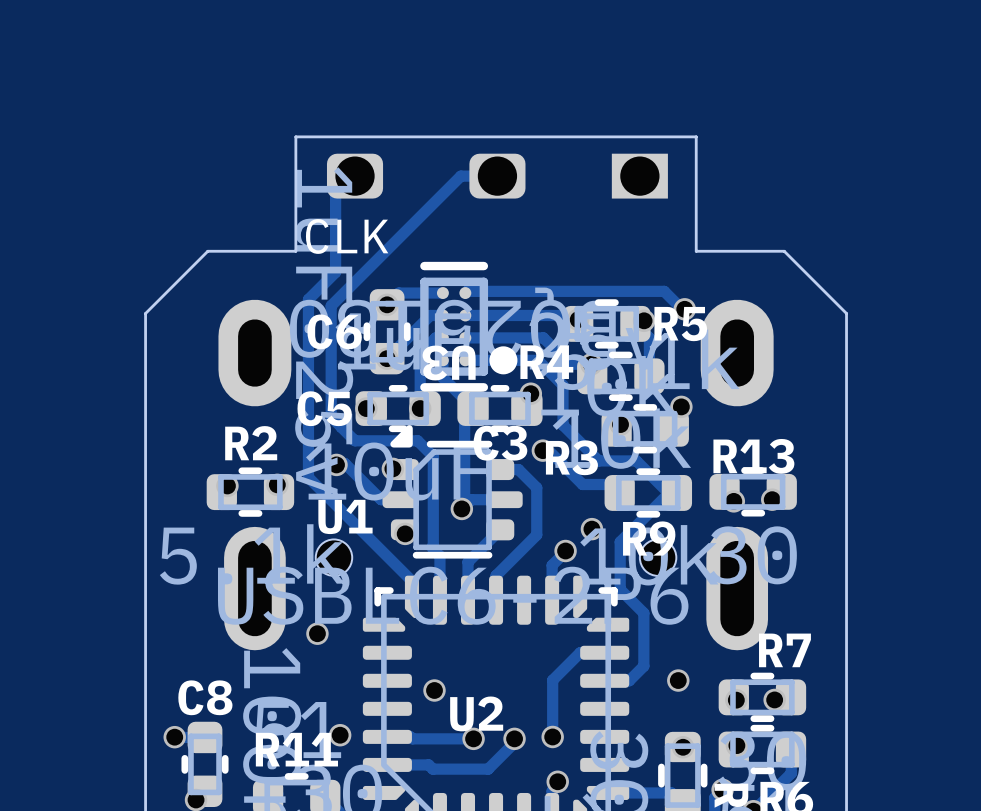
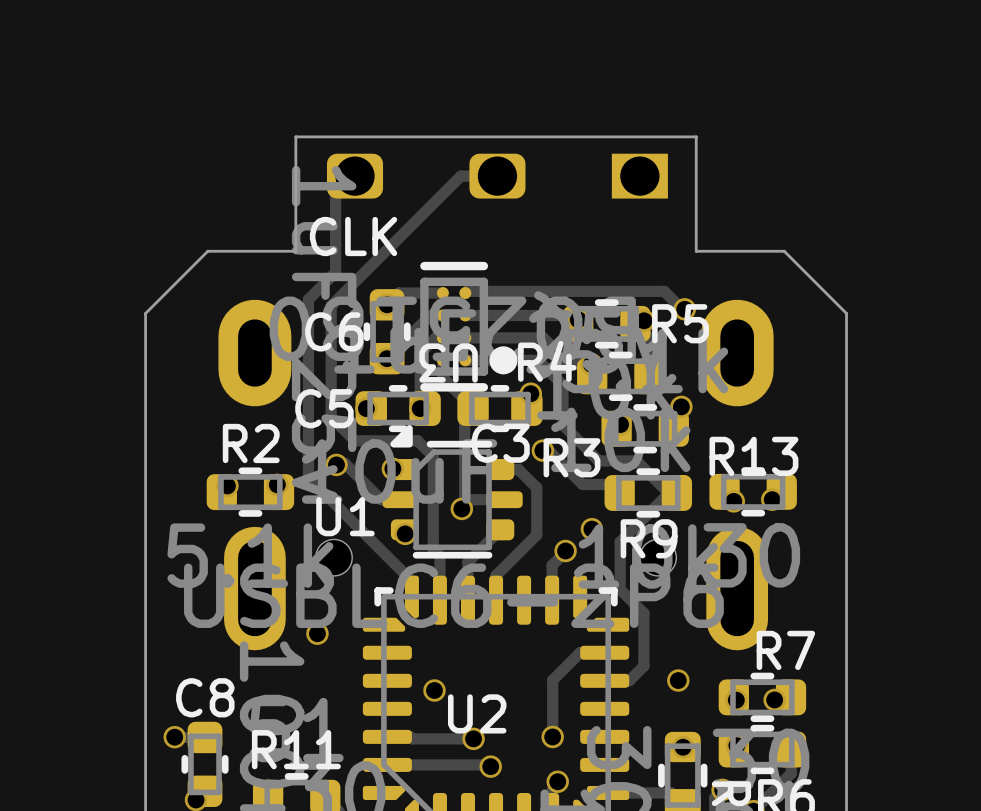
via: (340, 735) -> none
track: (514, 738) (514, 742) (488, 769) (432, 769) (428, 764) -> (490, 766) (489, 764) (428, 764)
via position: (514, 738) -> (490, 766)

